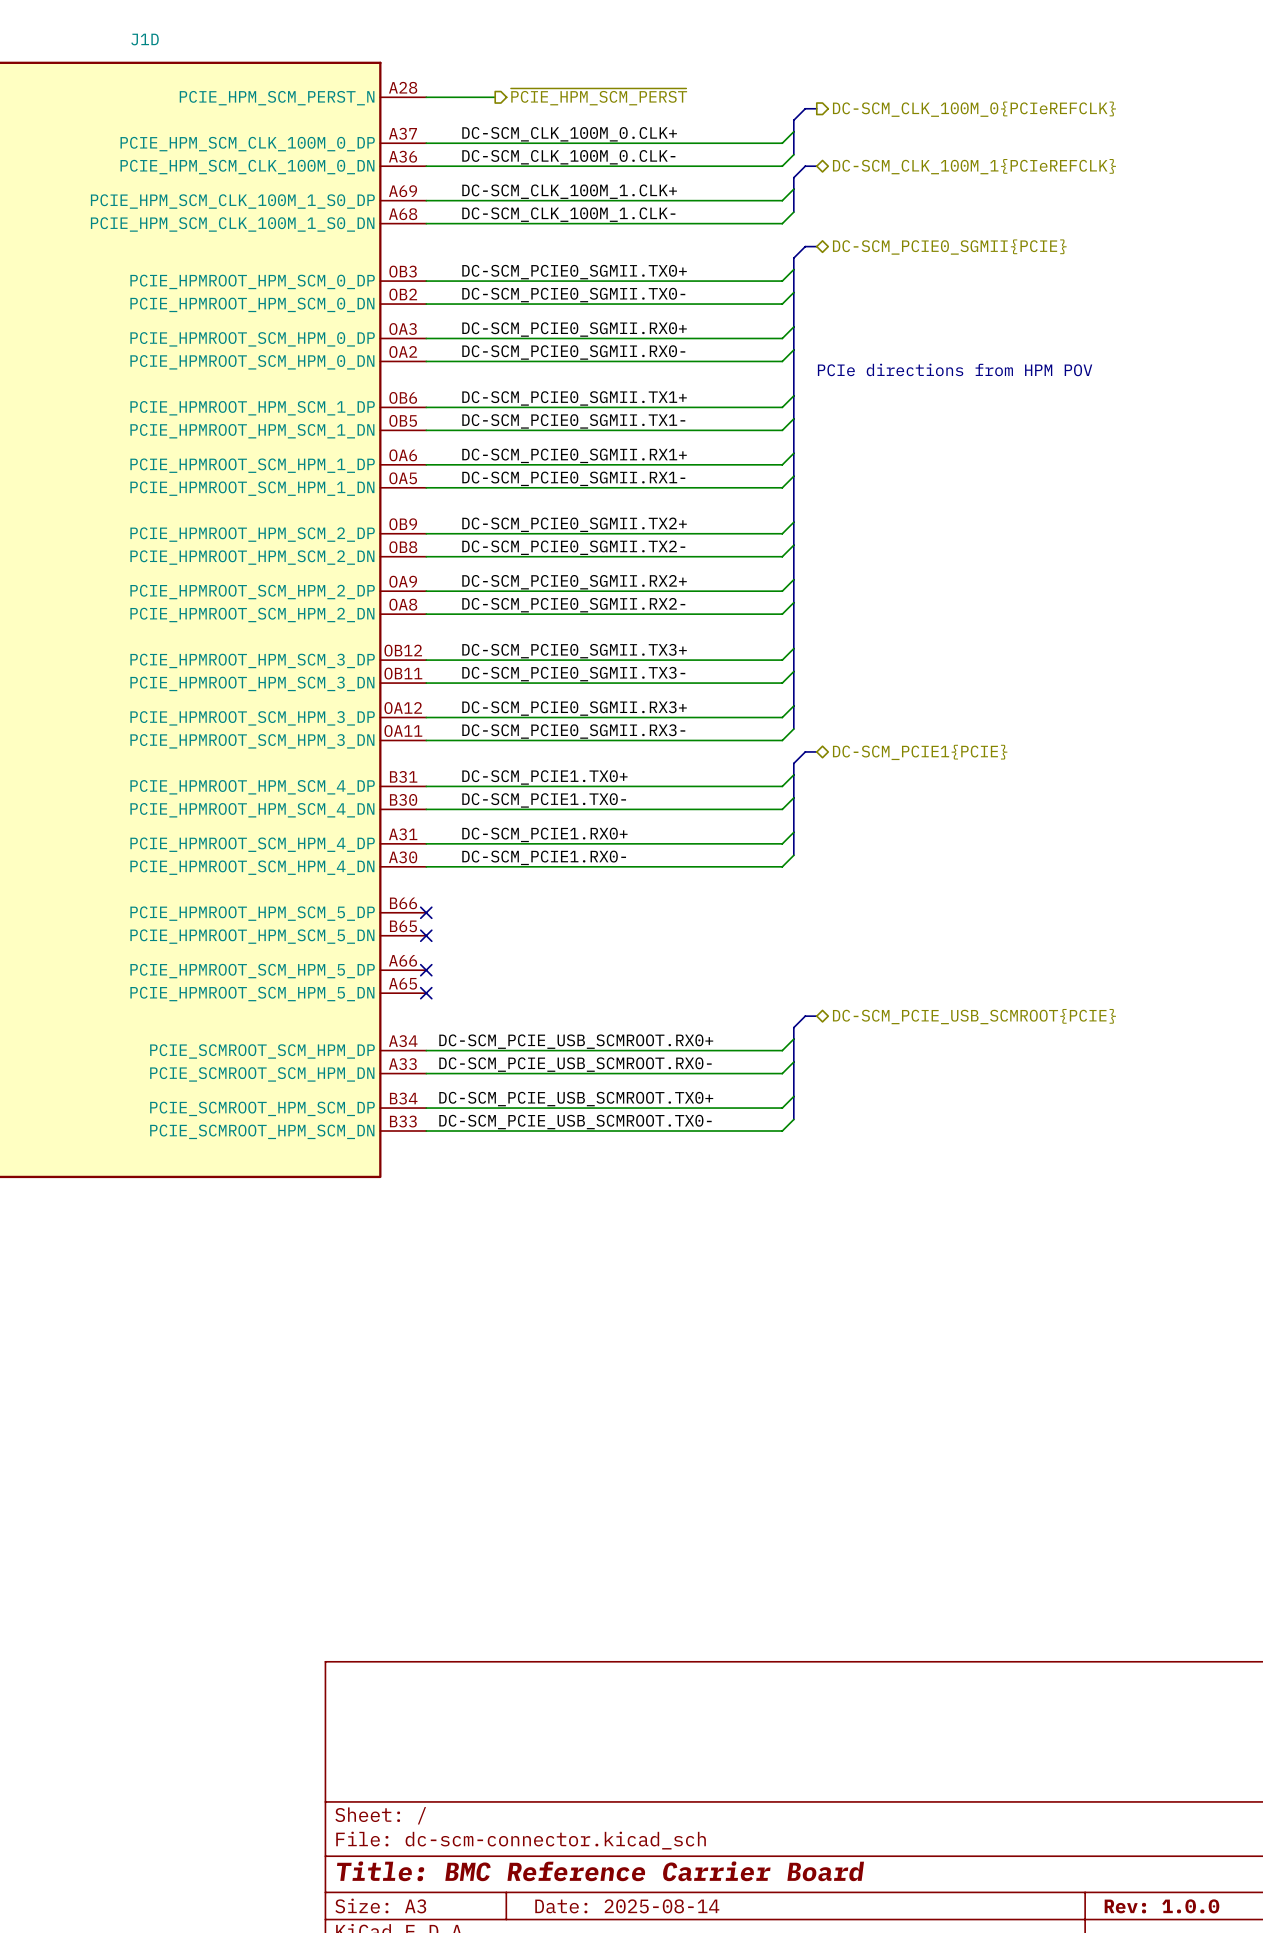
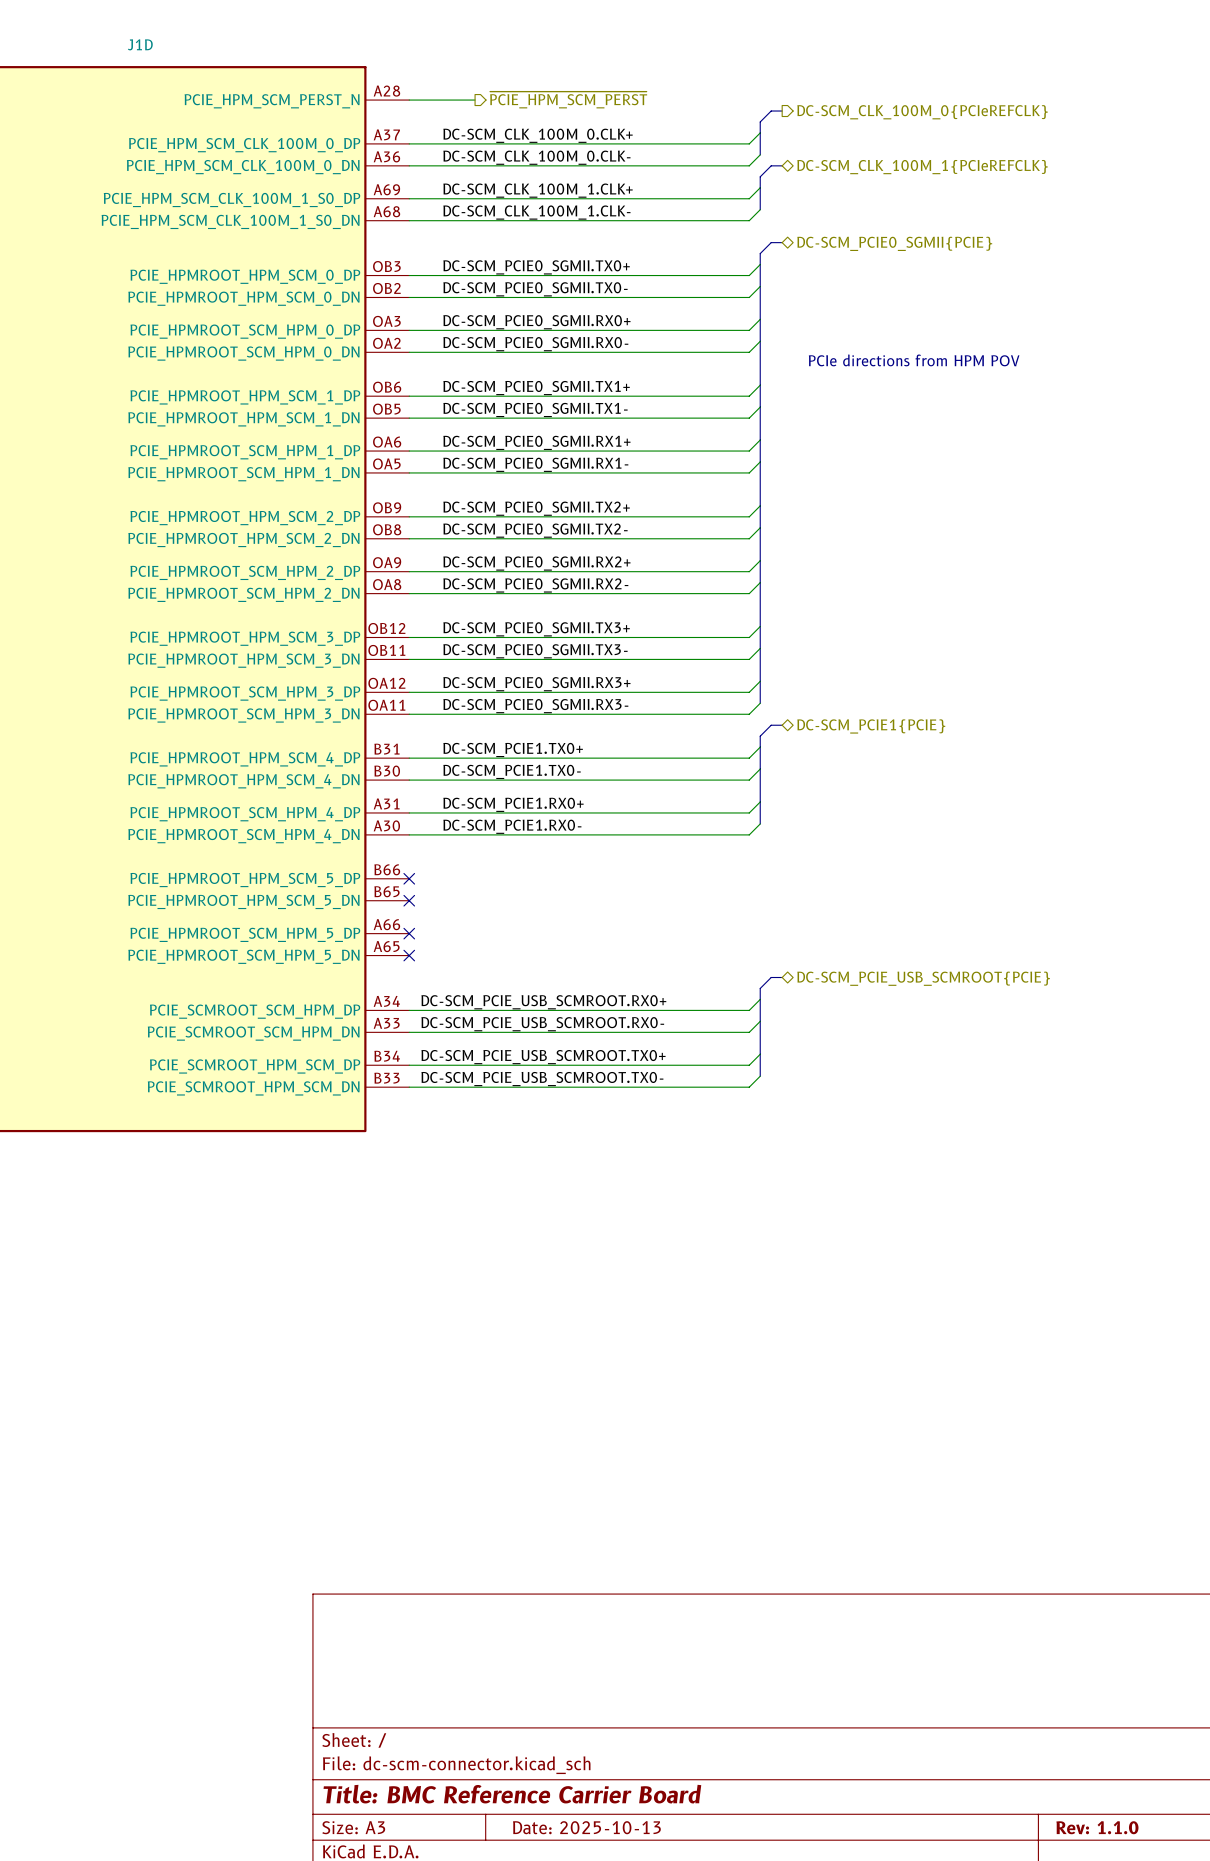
title block: Date: 2025-08-14 (627, 1906) -> Date: 2025-10-13 (586, 1827)
title block: Rev: 1.0.0 (1161, 1906) -> Rev: 1.1.0 (1097, 1827)

